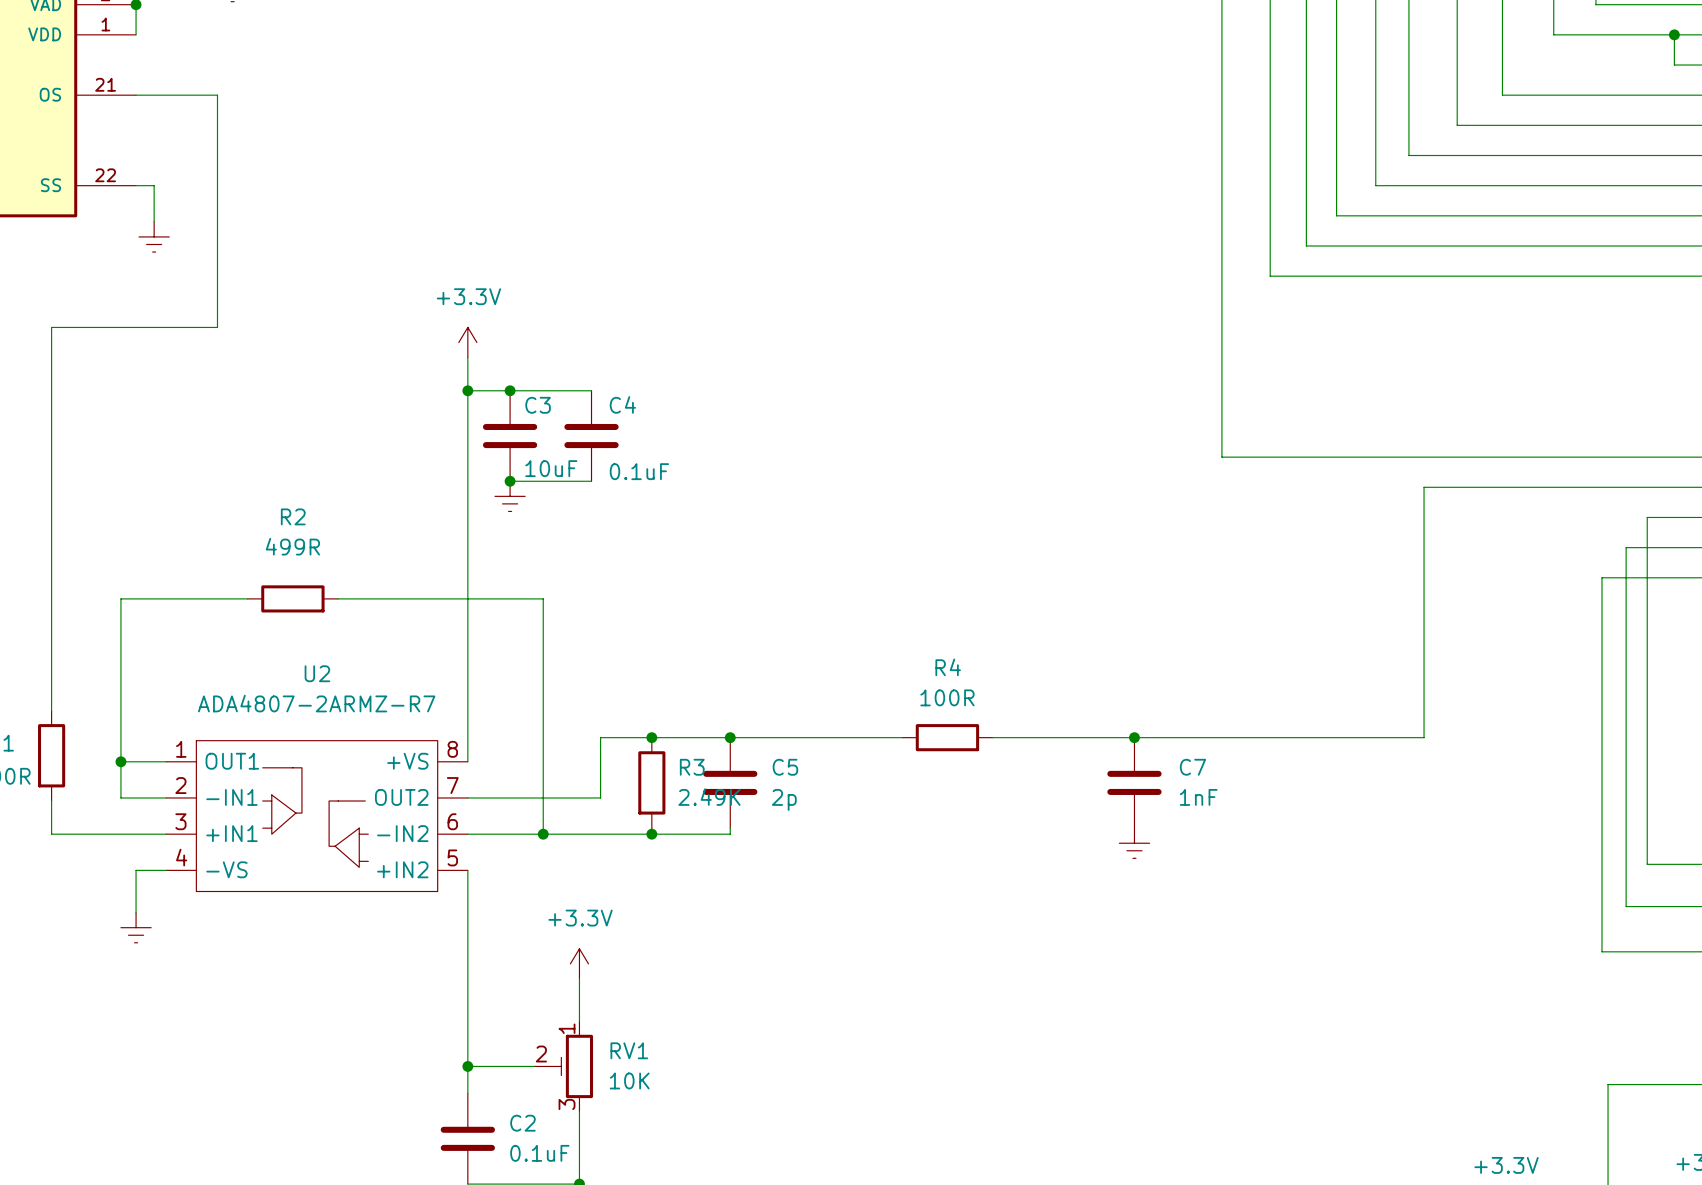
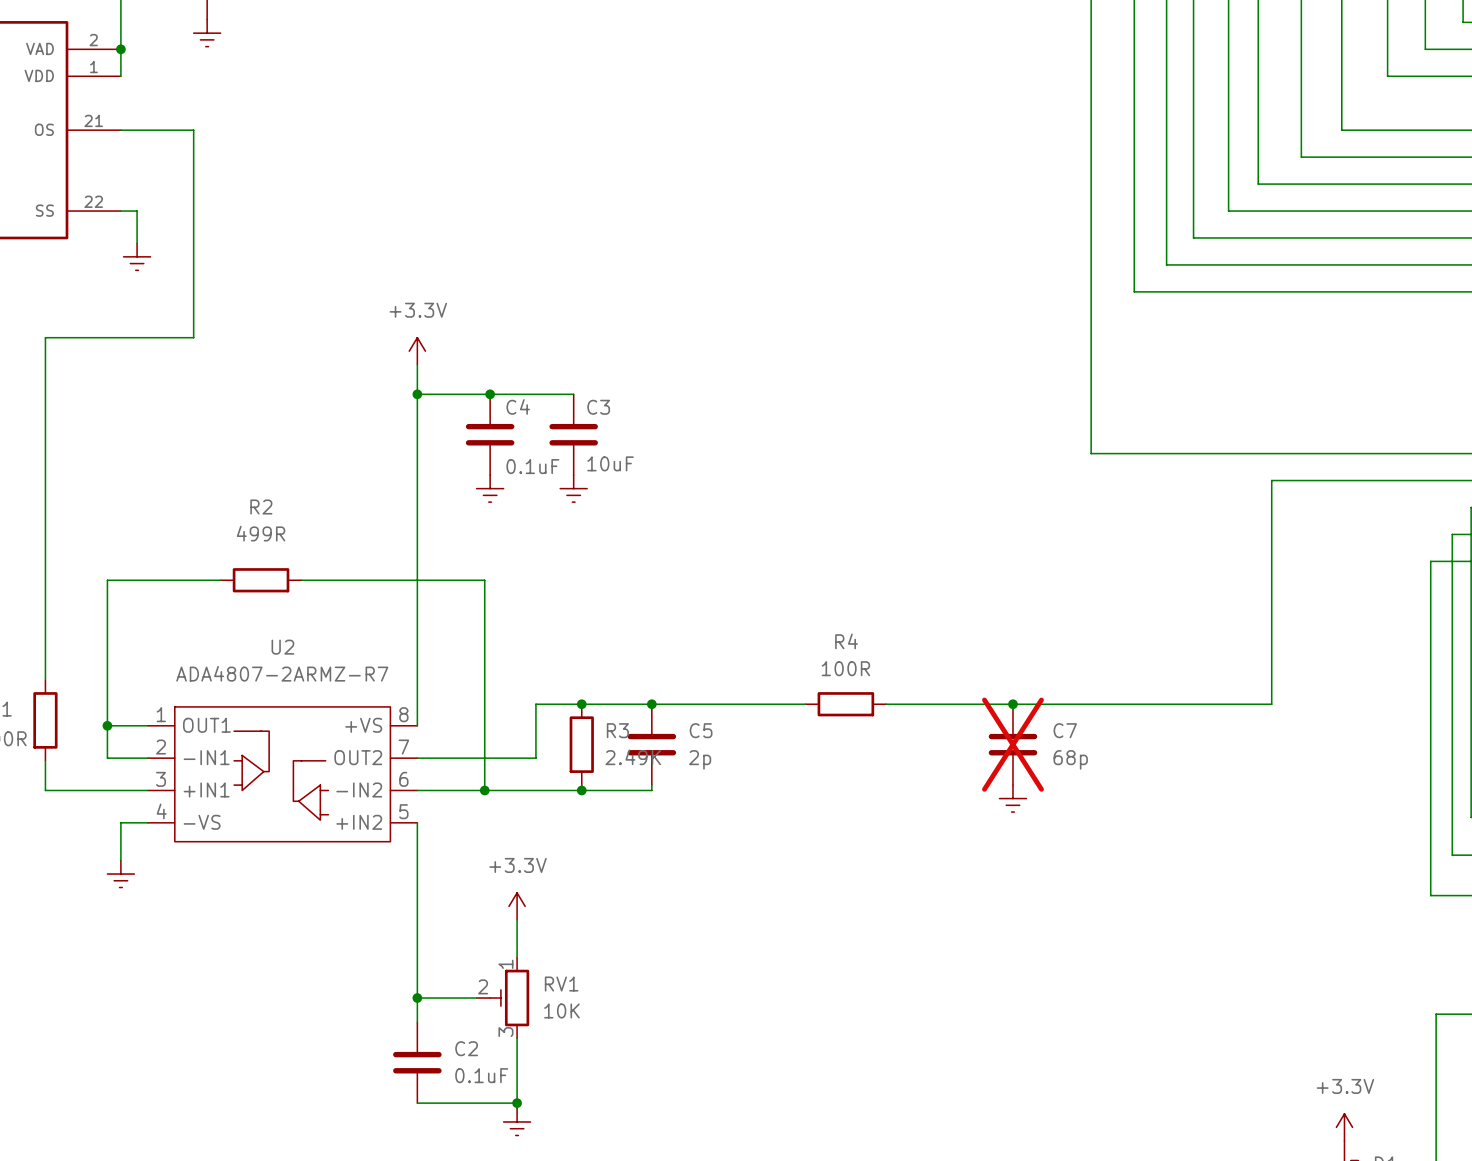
junction position: (510, 390) -> (490, 394)
wire: none -> (527, 394) (573, 394)
C3 position: (510, 436) -> (573, 434)
C4 position: (591, 436) -> (490, 434)
wire: (510, 481) (591, 481) -> none
junction: (510, 481) -> none
power symbol position: (510, 496) -> (490, 488)
power symbol: none -> (573, 488)
C7 do-not-place cross: none -> (1012, 744)
C7 value: 1nF (1198, 797) -> 68p (1070, 759)

